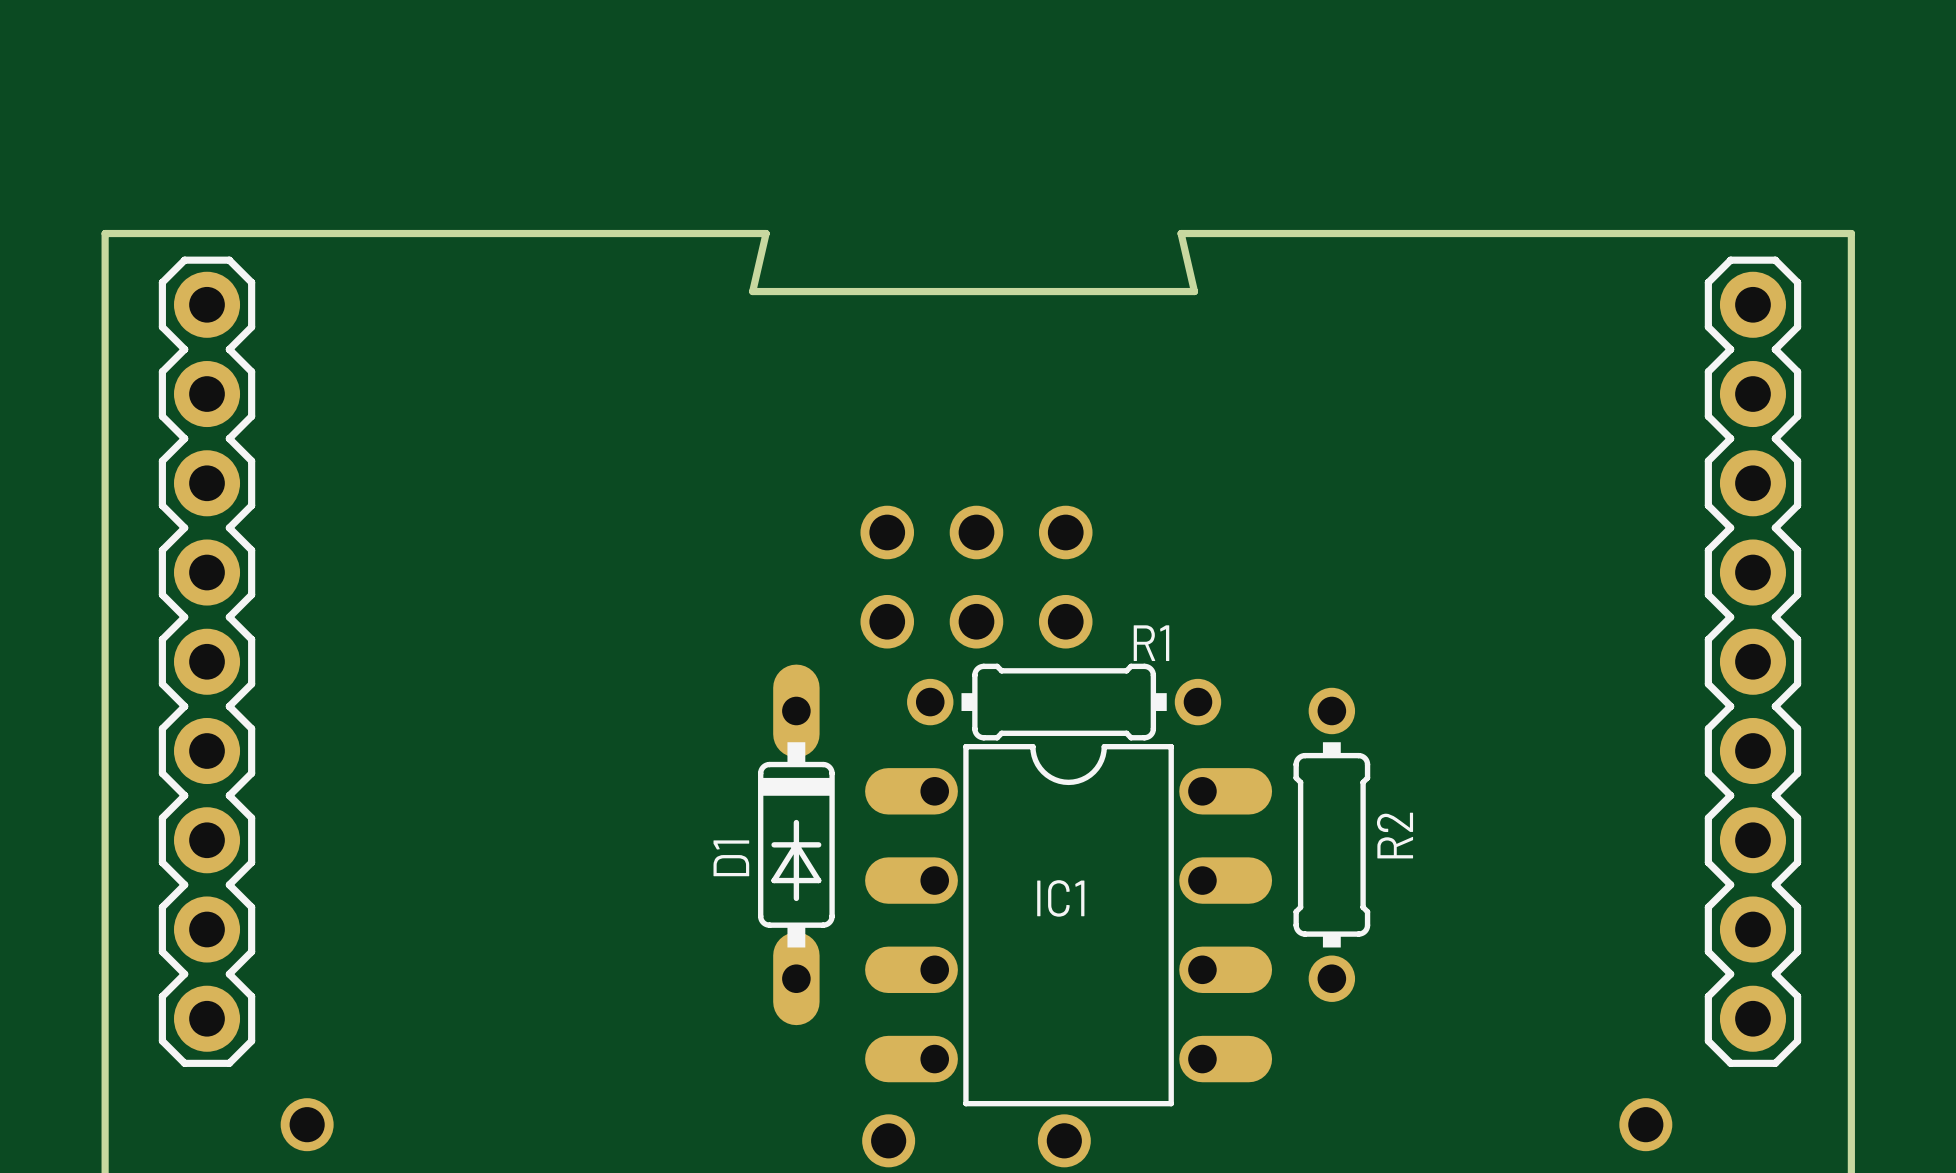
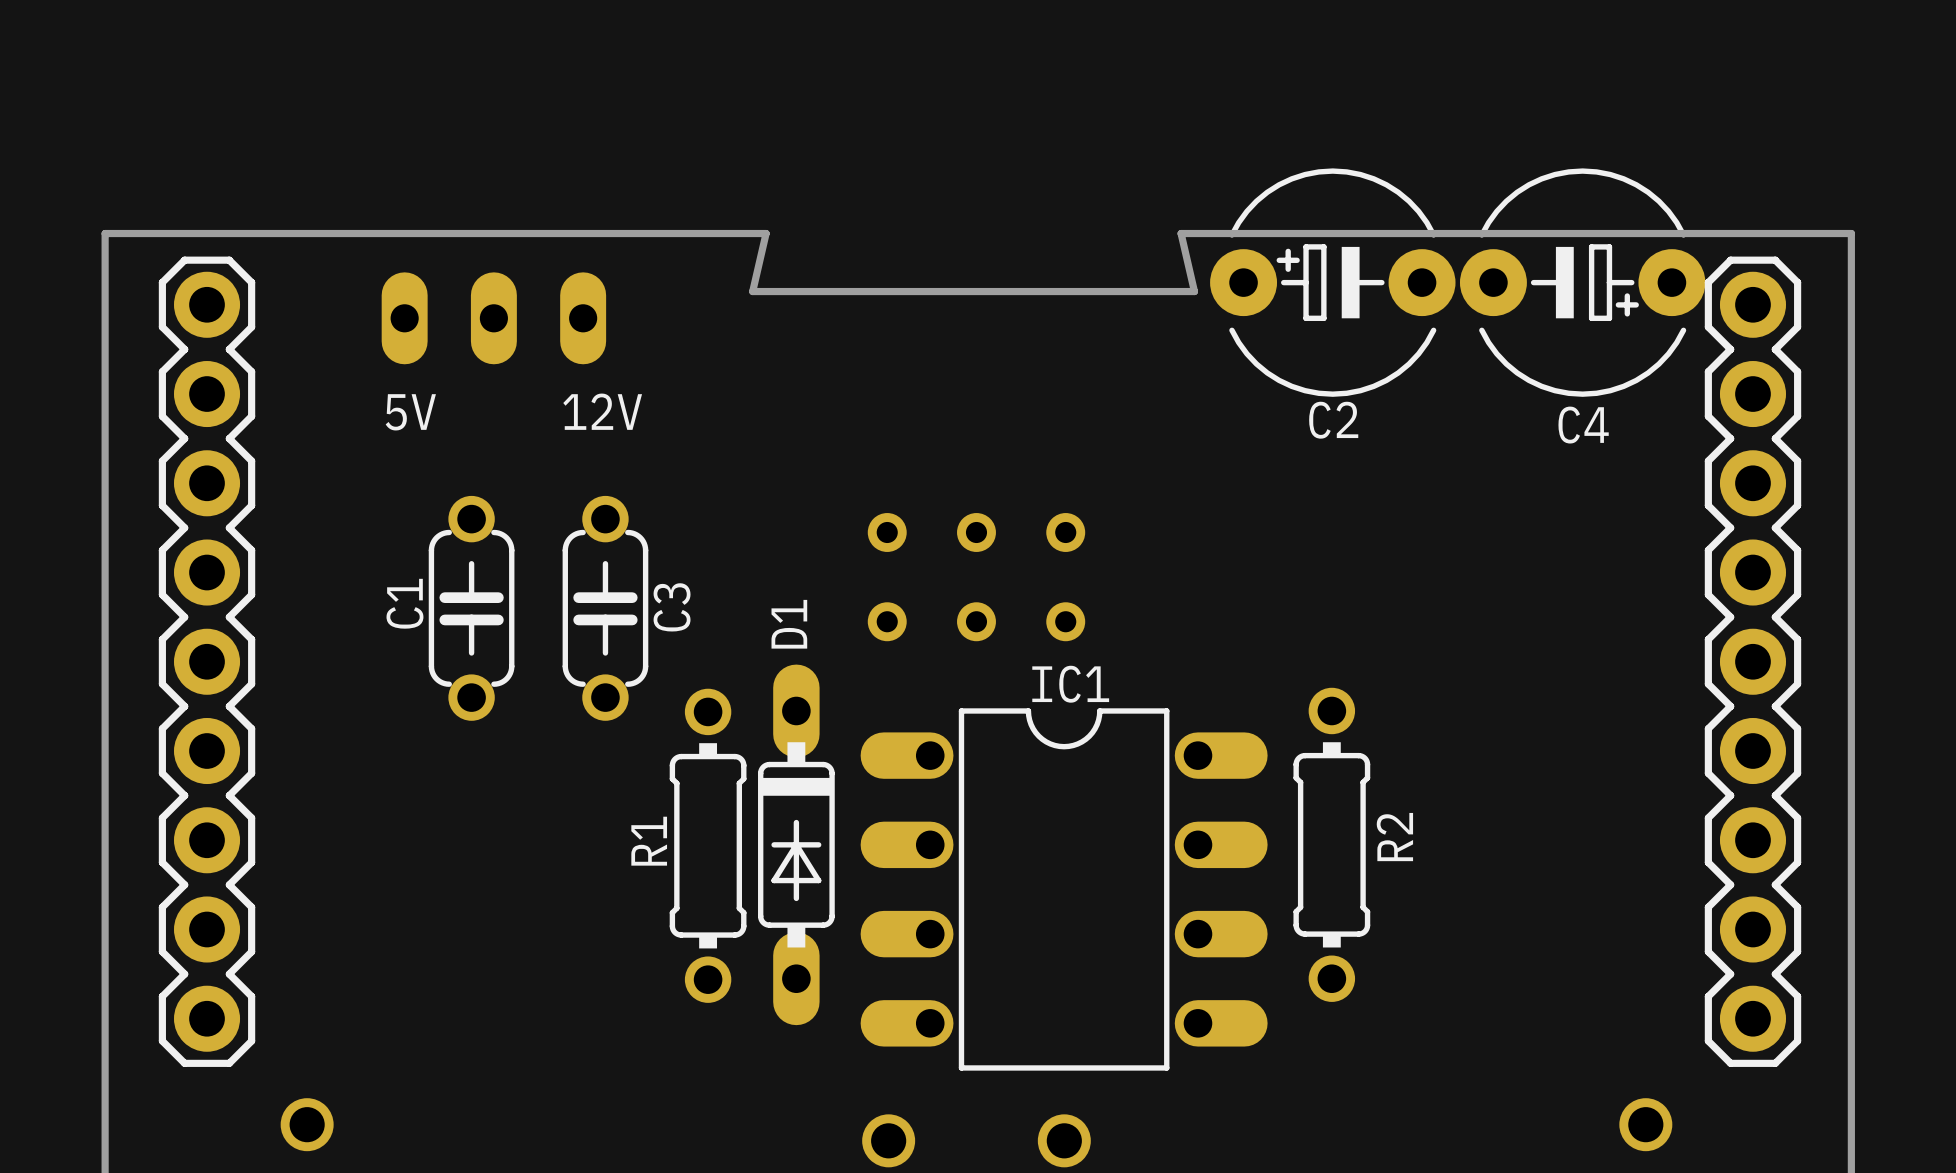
C2: none -> (1332, 282)
C4: none -> (1582, 282)
part: none -> (493, 318)
text: none -> 12V (602, 411)
text: none -> 5V (410, 412)
part footprint: [860, 505, 1093, 649] -> [867, 513, 1086, 642]
C1: none -> (471, 608)
C3: none -> (605, 608)
R1 name position: R1 (1151, 643) -> R1 (649, 841)
R1 rotation: 0° (1064, 702) -> 90° clockwise (708, 845)
R1 position: (1064, 702) -> (708, 845)
D1 name position: D1 (731, 858) -> D1 (789, 624)
IC1 name position: IC1 (1060, 898) -> IC1 (1070, 684)
IC1 position: (1068, 925) -> (1064, 889)

